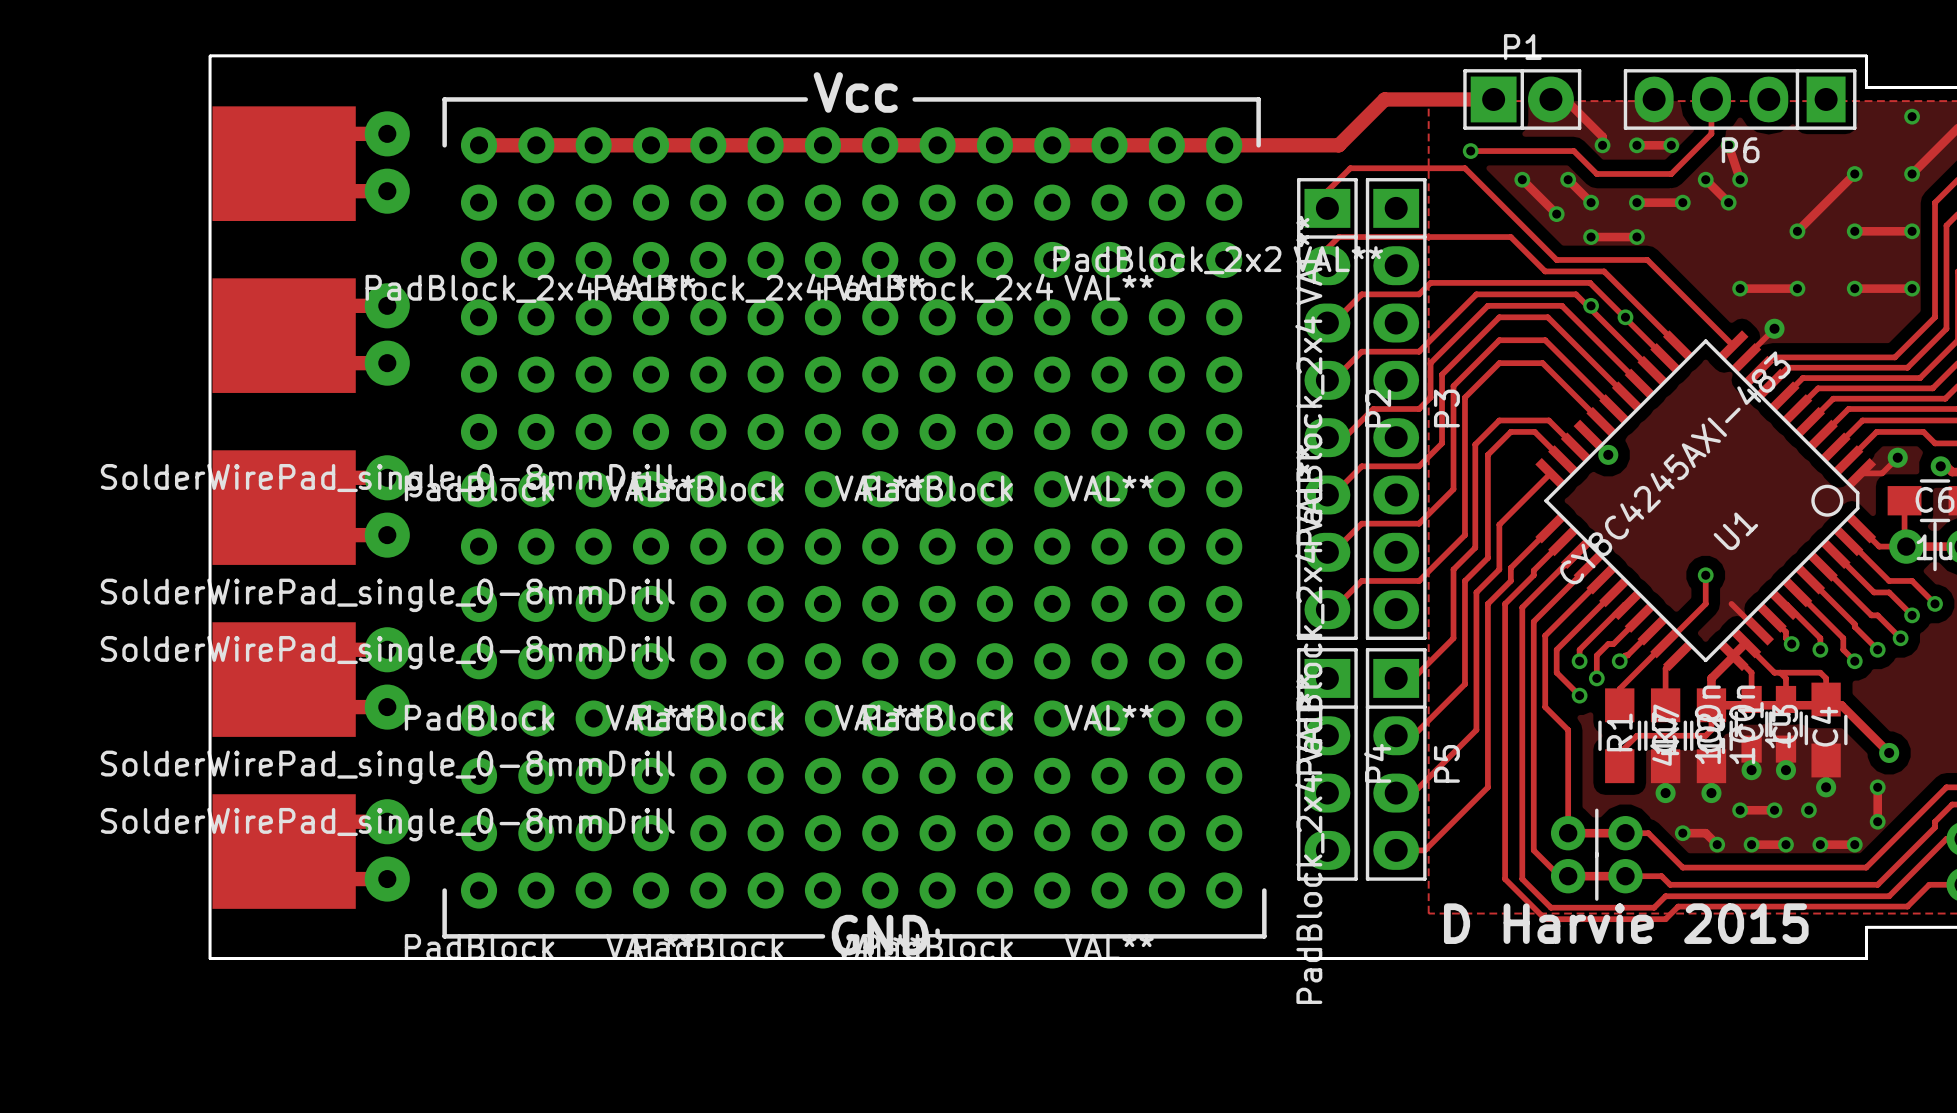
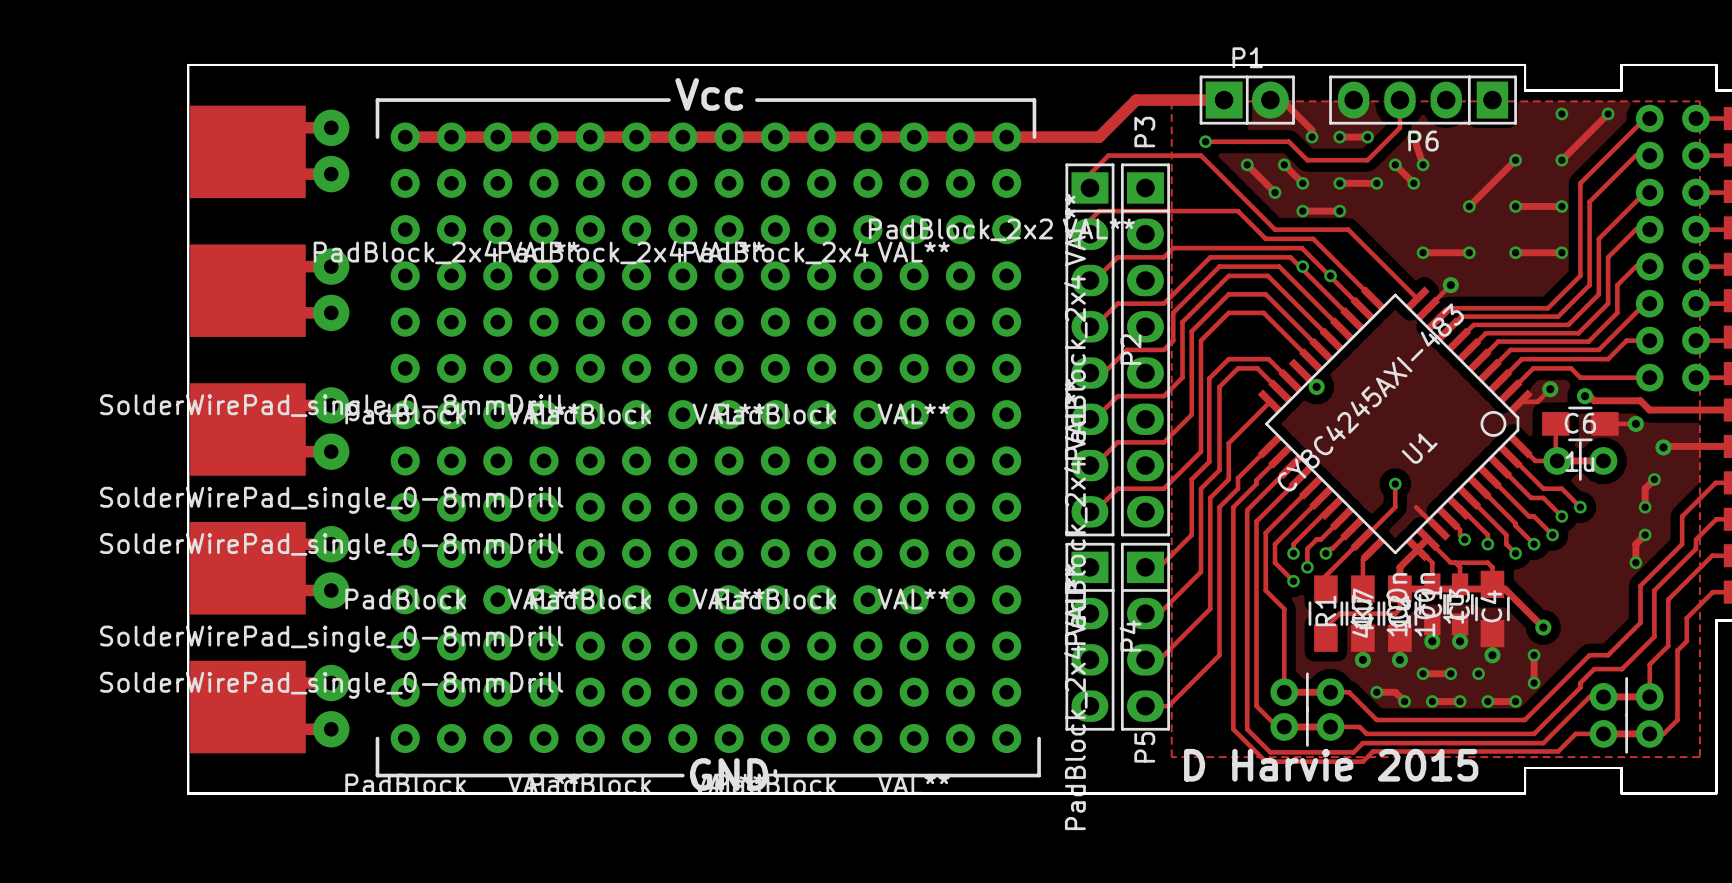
P3 name position: P3 (1446, 408) -> P3 (1144, 132)
P5 name position: P5 (1446, 763) -> P5 (1144, 747)

